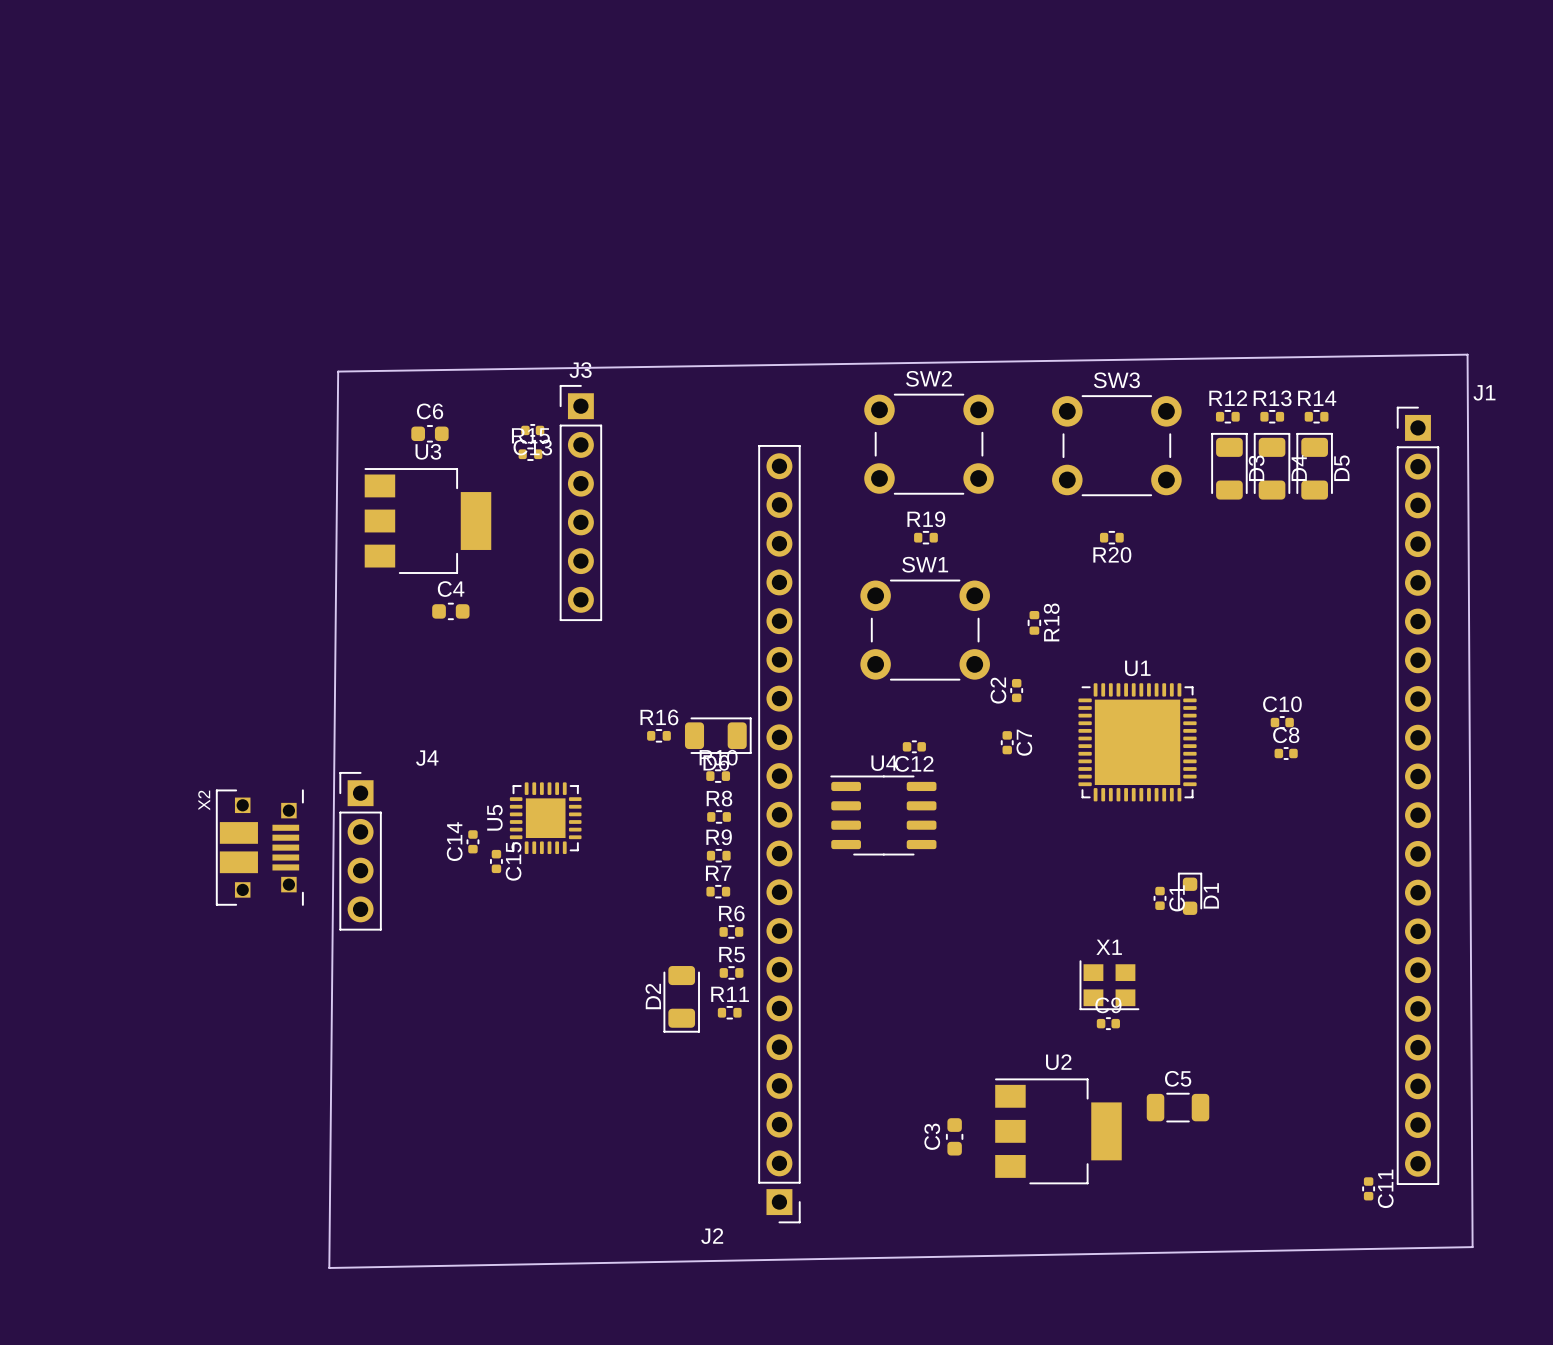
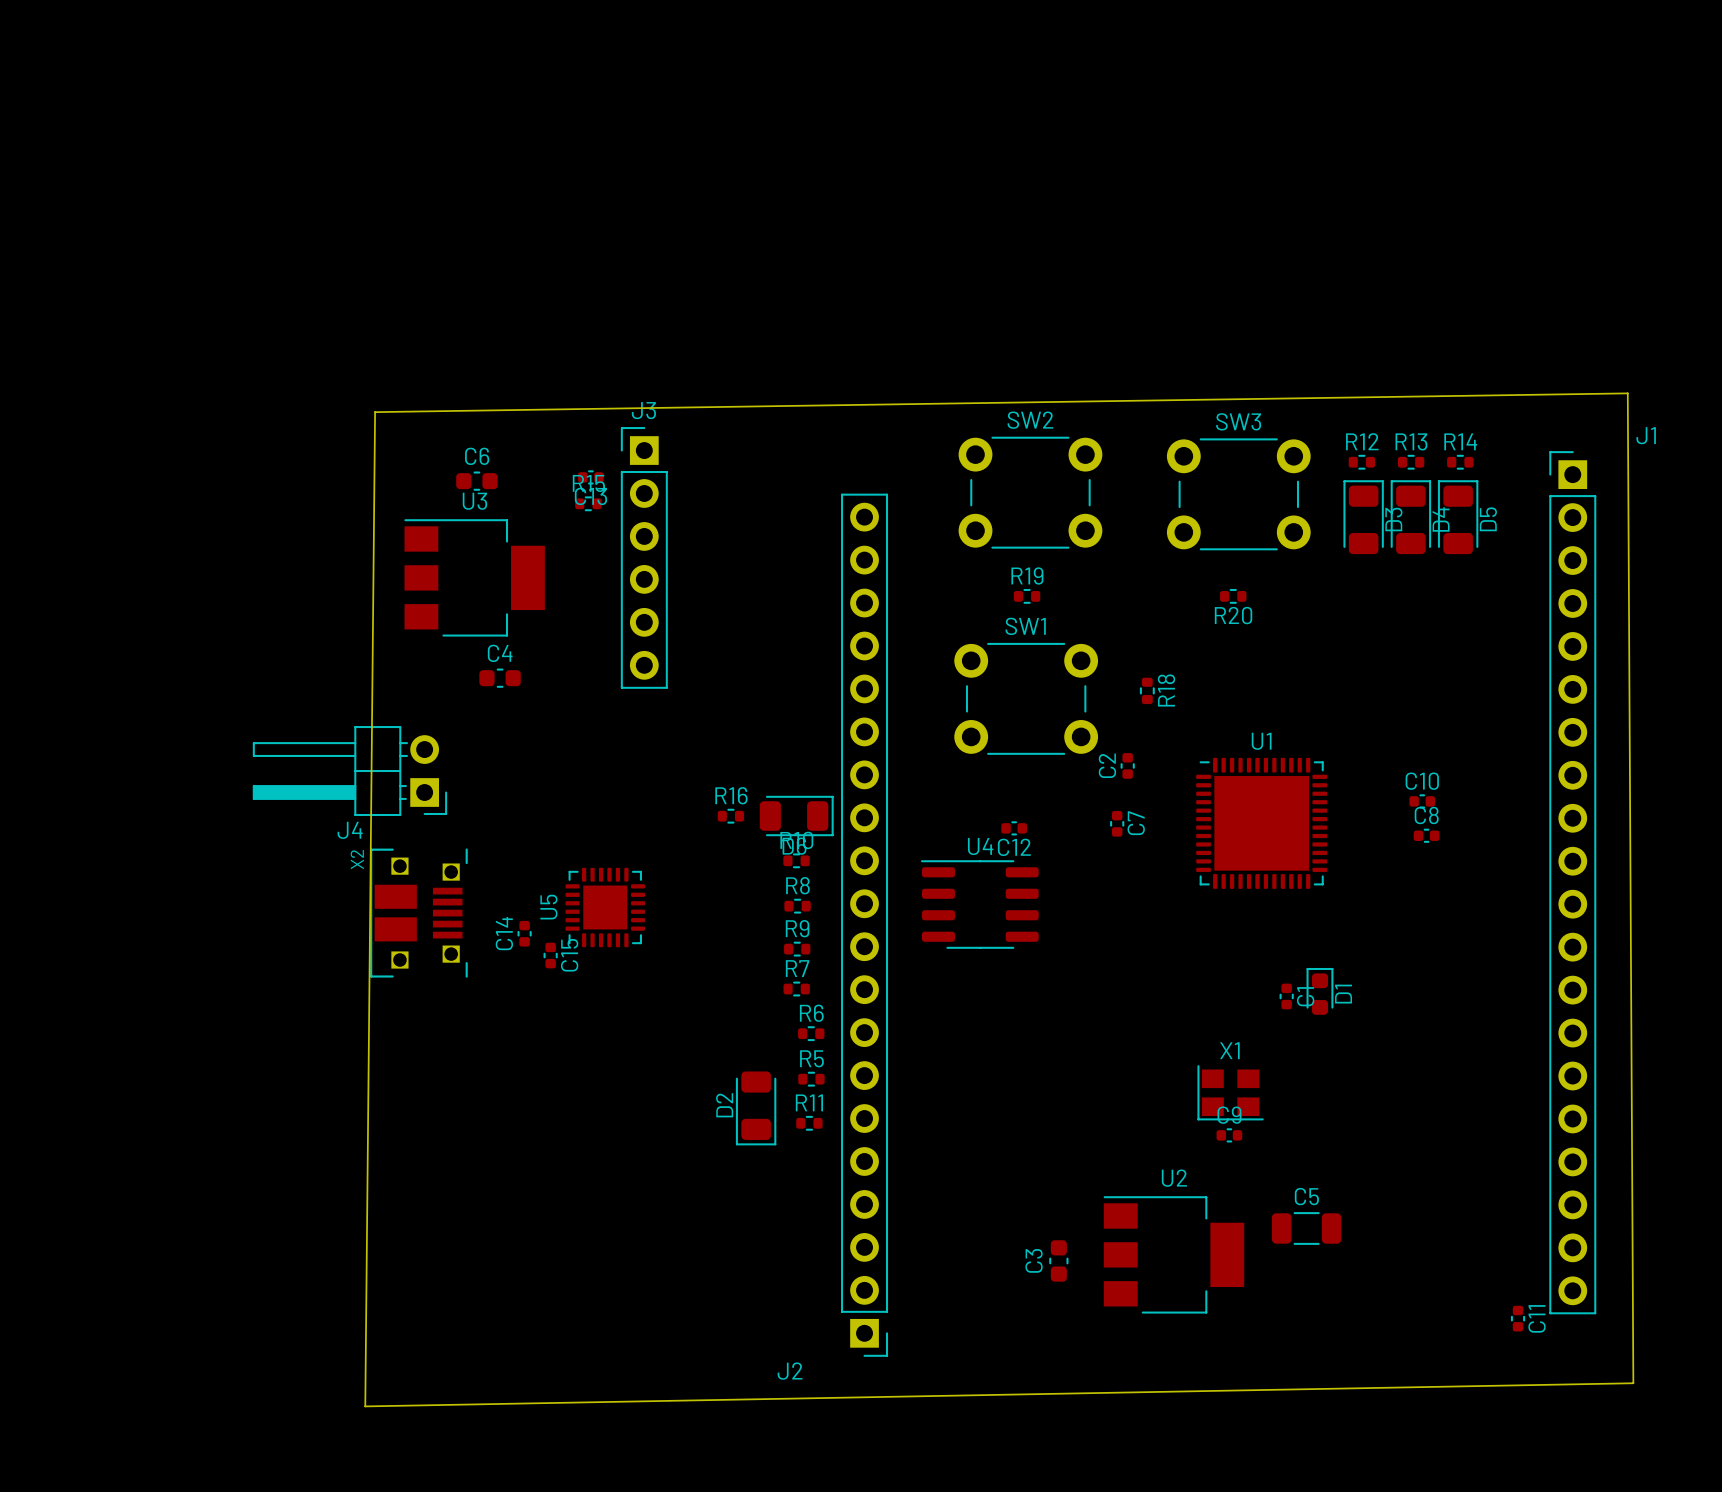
J4 name position: J4 (427, 758) -> J4 (350, 830)
J4 footprint: [339, 771, 382, 931] -> [252, 726, 448, 817]
X2 position: (259, 847) -> (418, 913)

